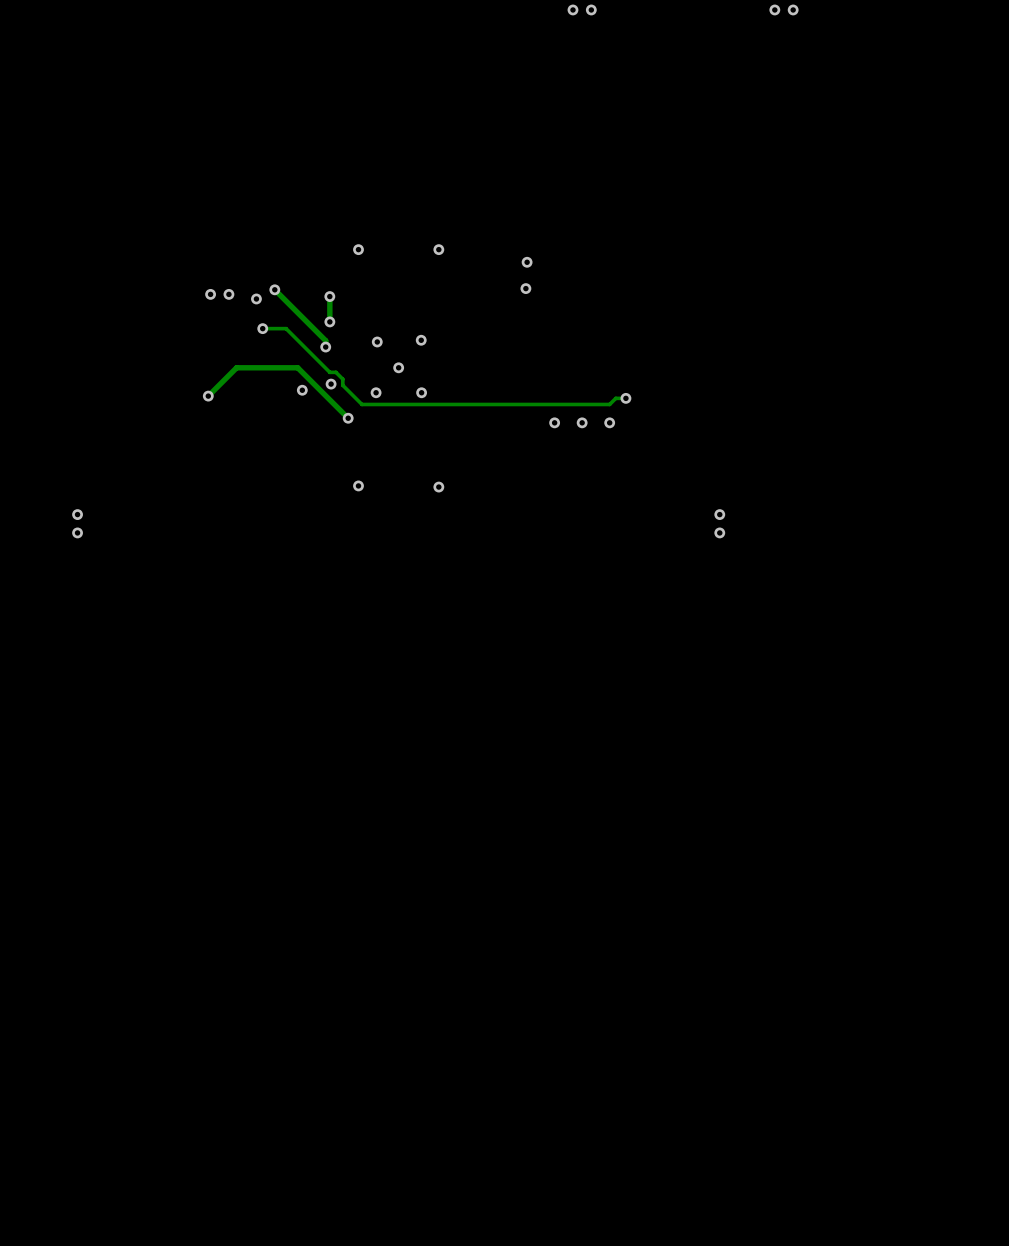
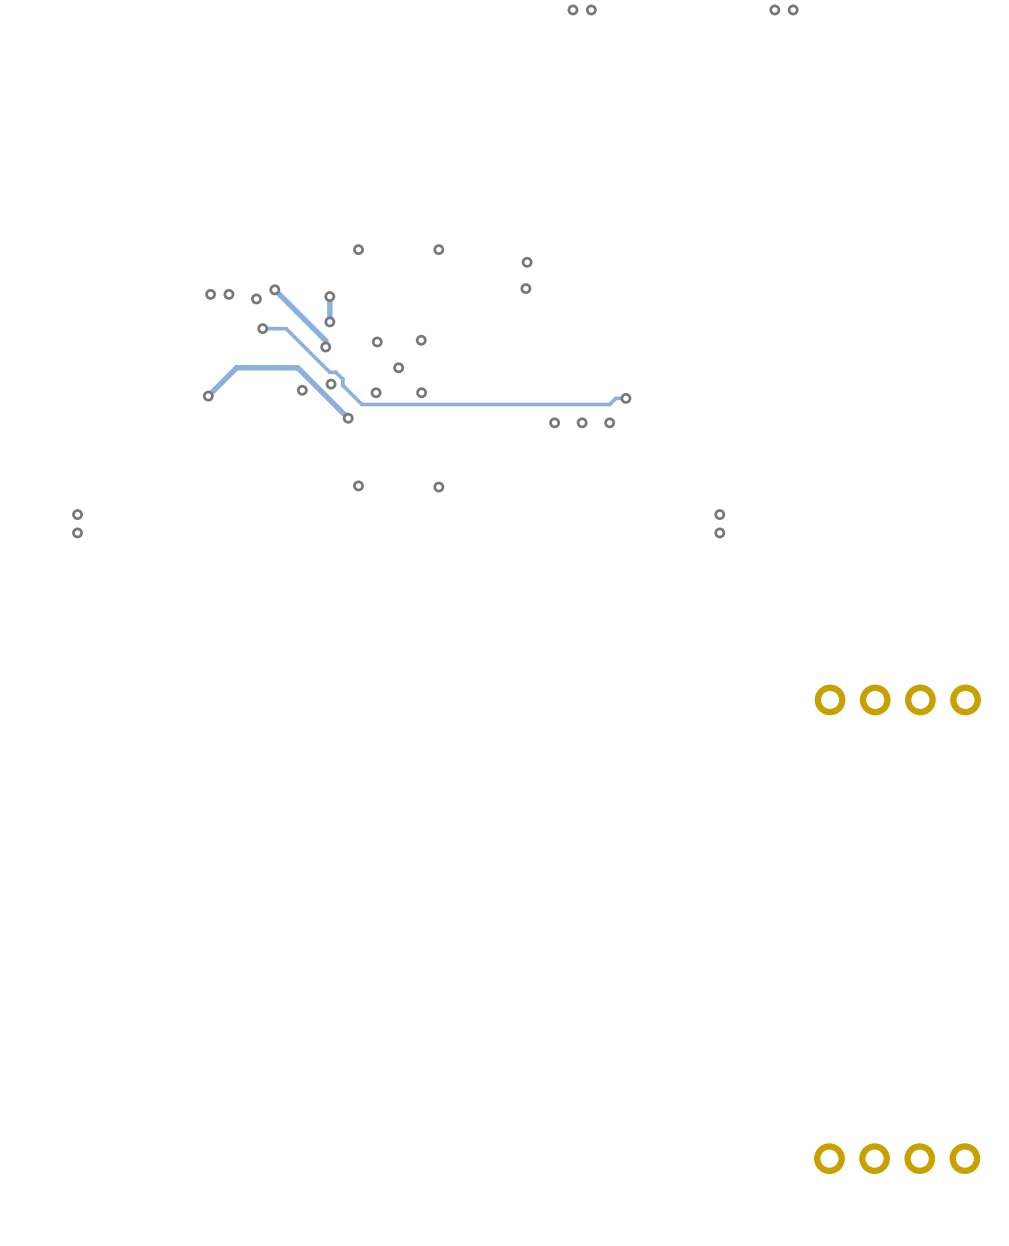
part: none -> (897, 699)
part: none -> (897, 1158)

